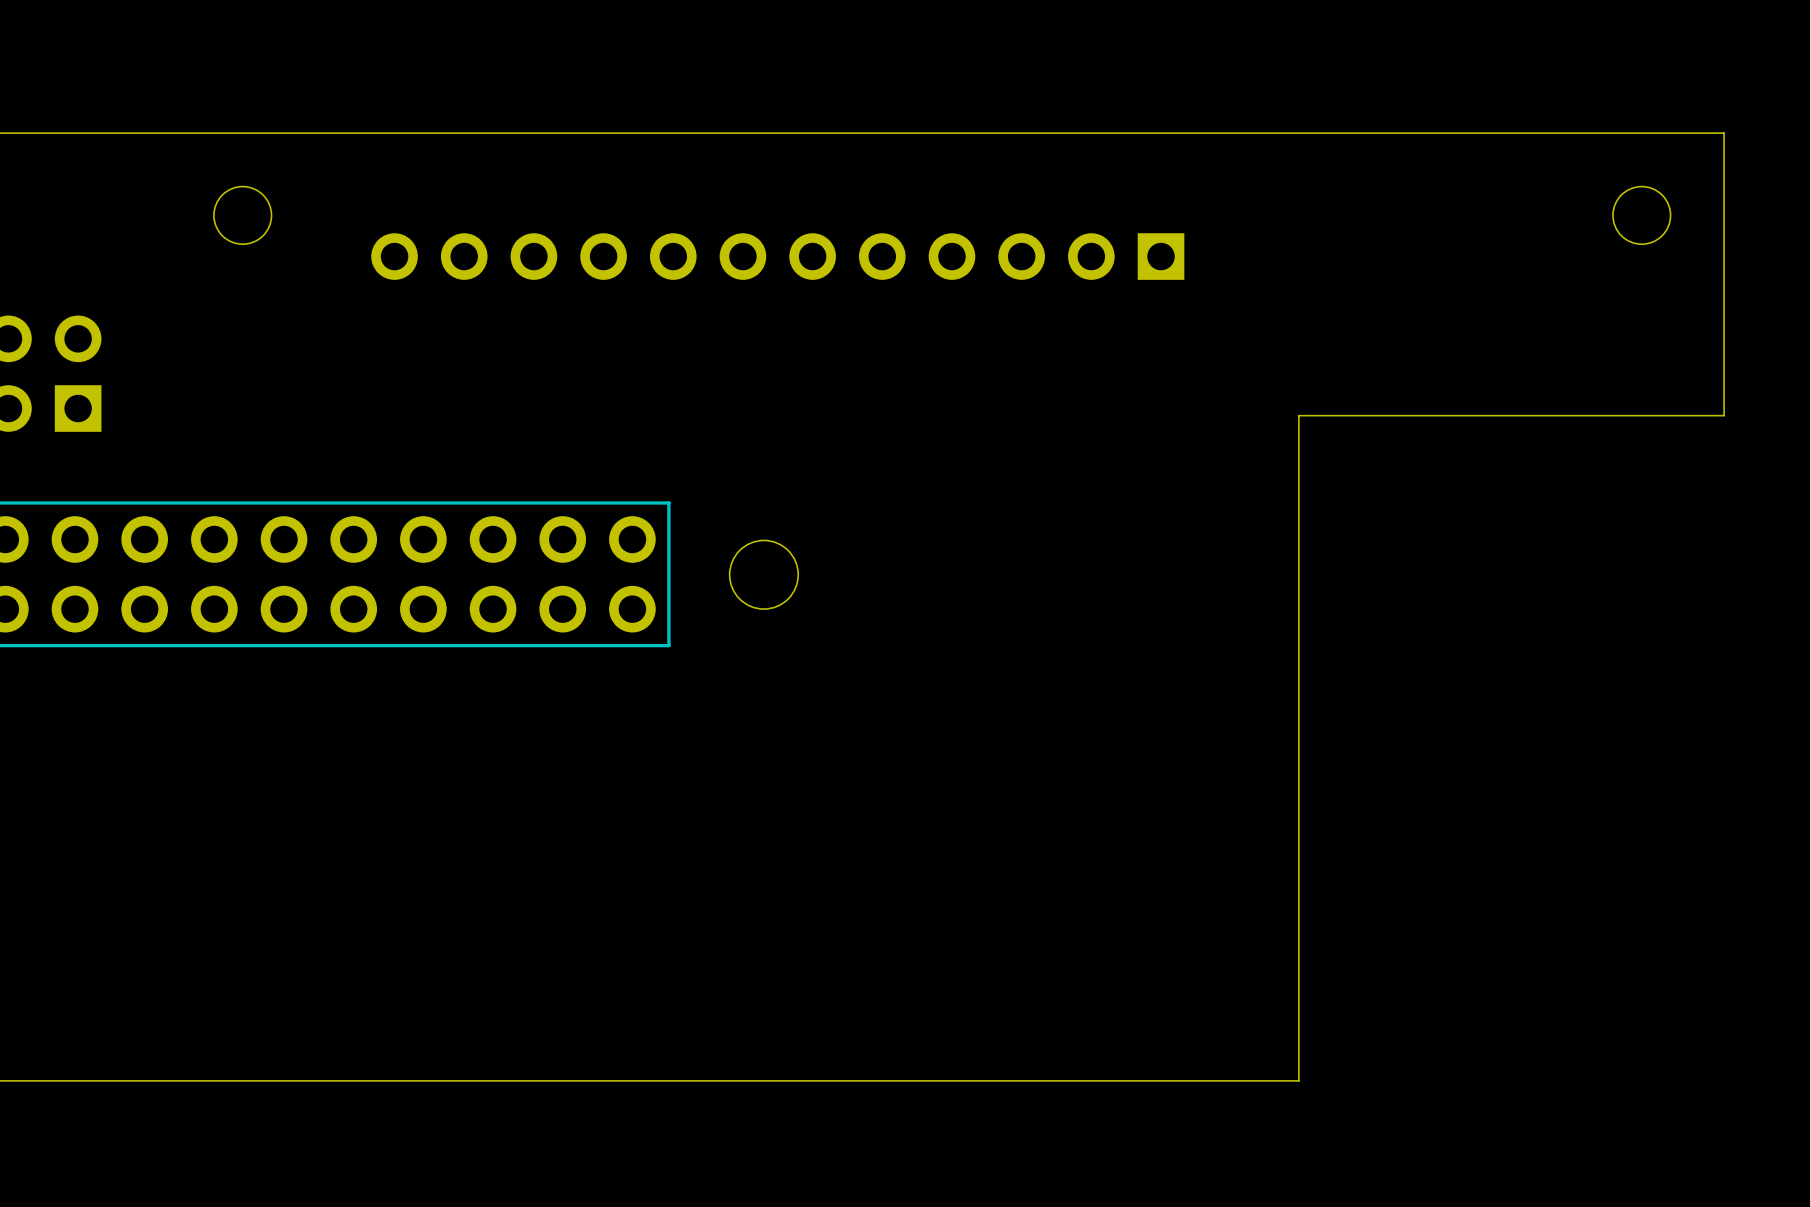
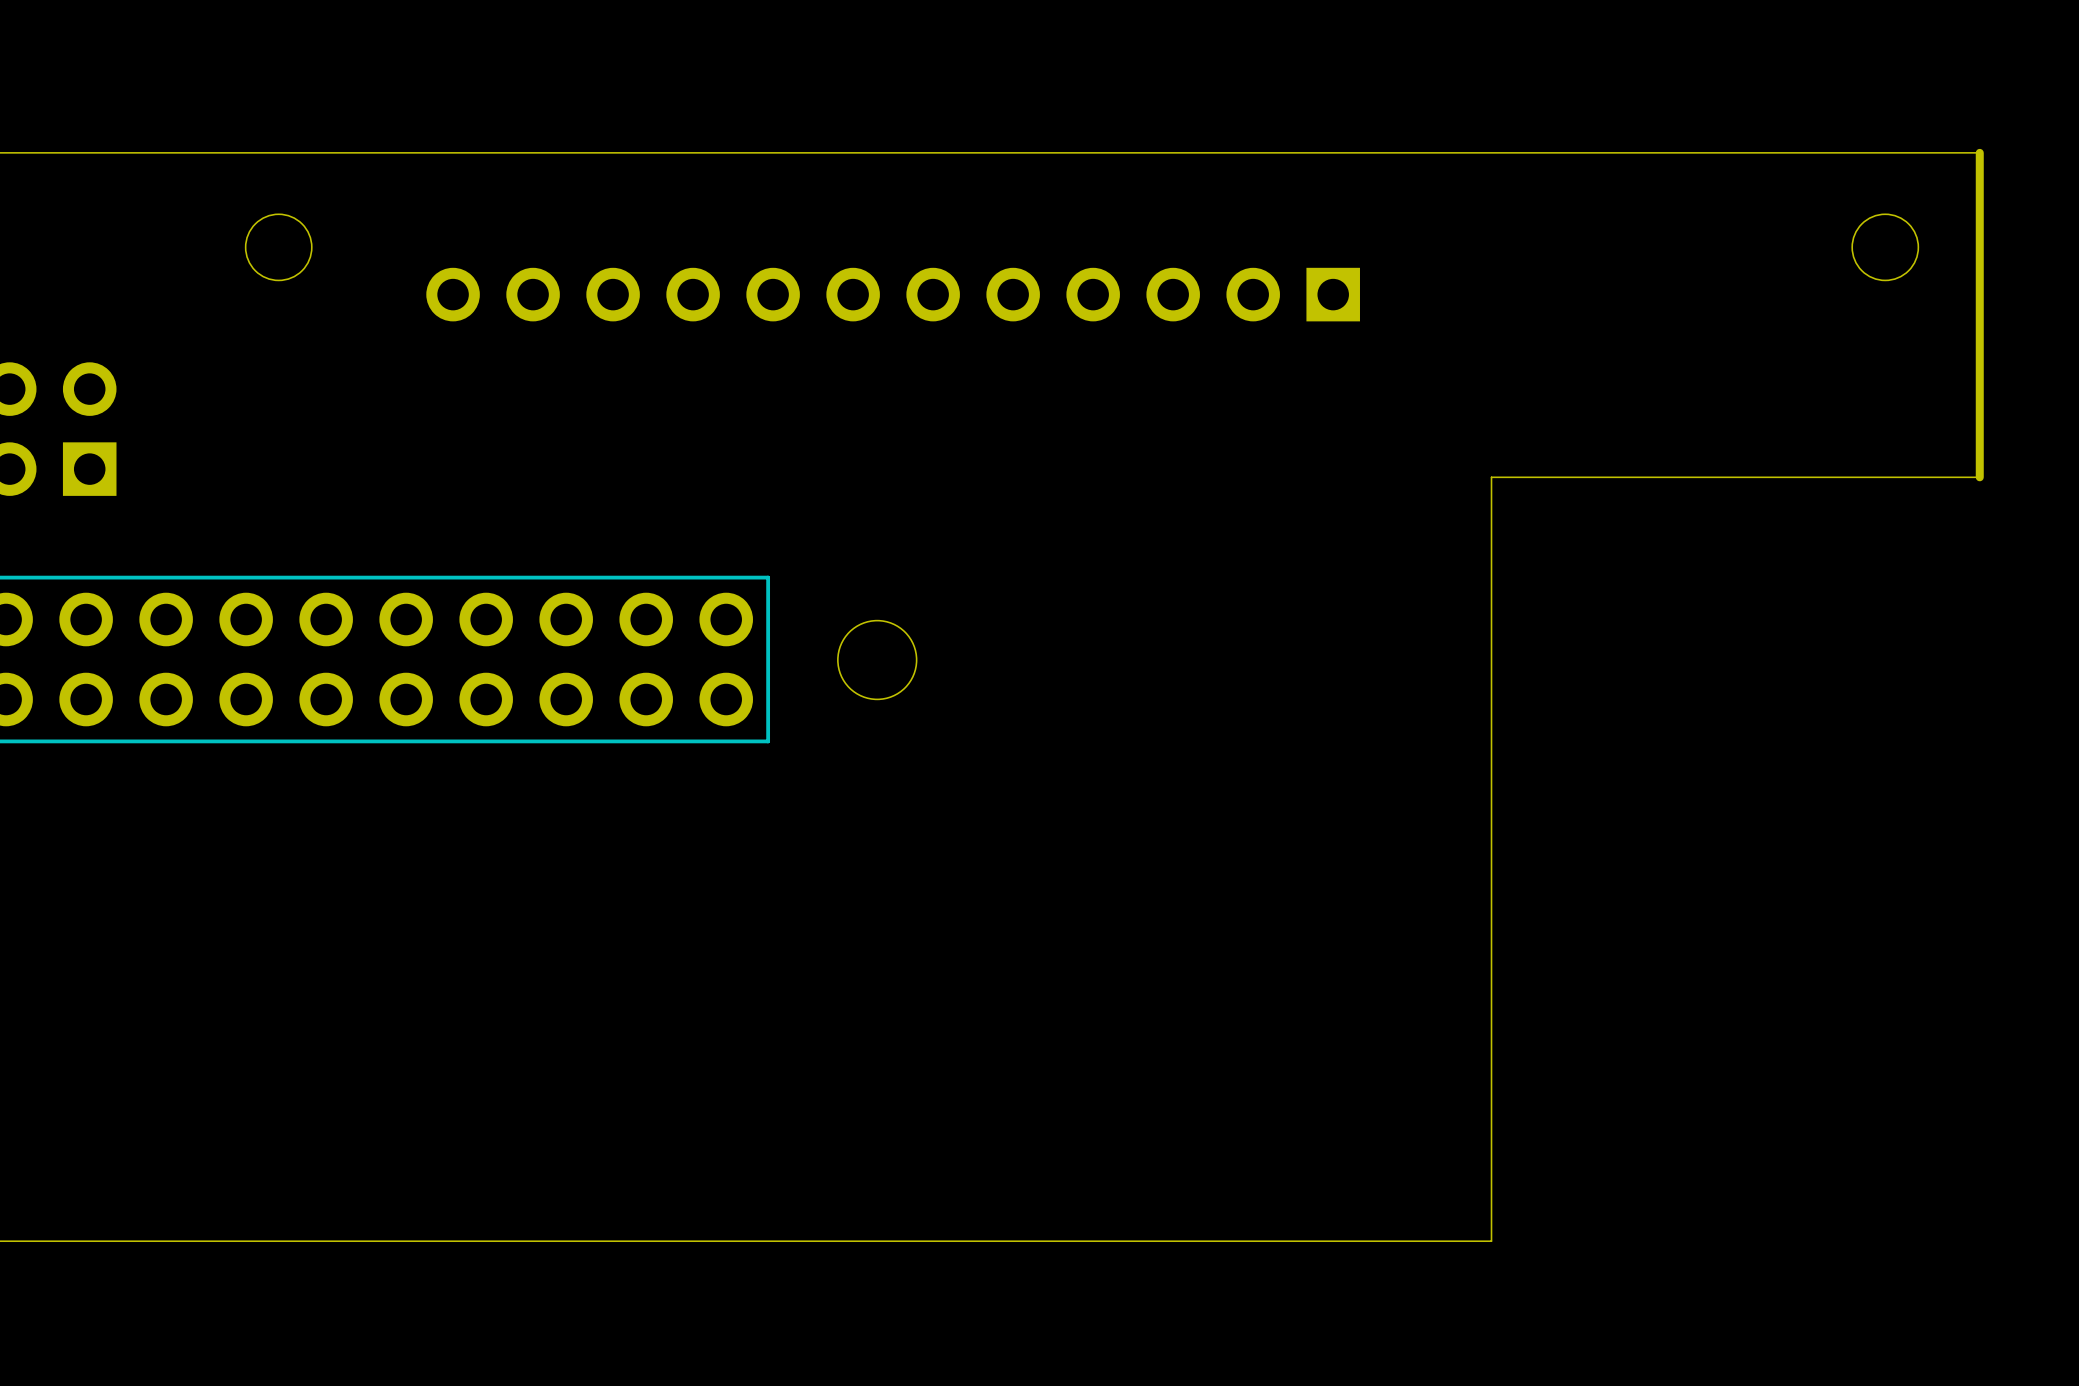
board edge width: thin (1724, 133) (1724, 415) -> thick (1979, 152) (1979, 477)

